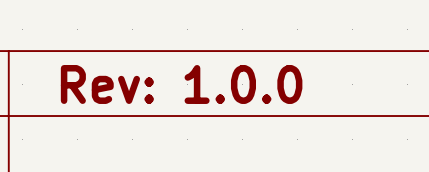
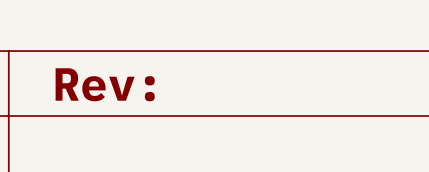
title block: Rev: 1.0.0 (181, 84) -> Rev: (105, 84)

